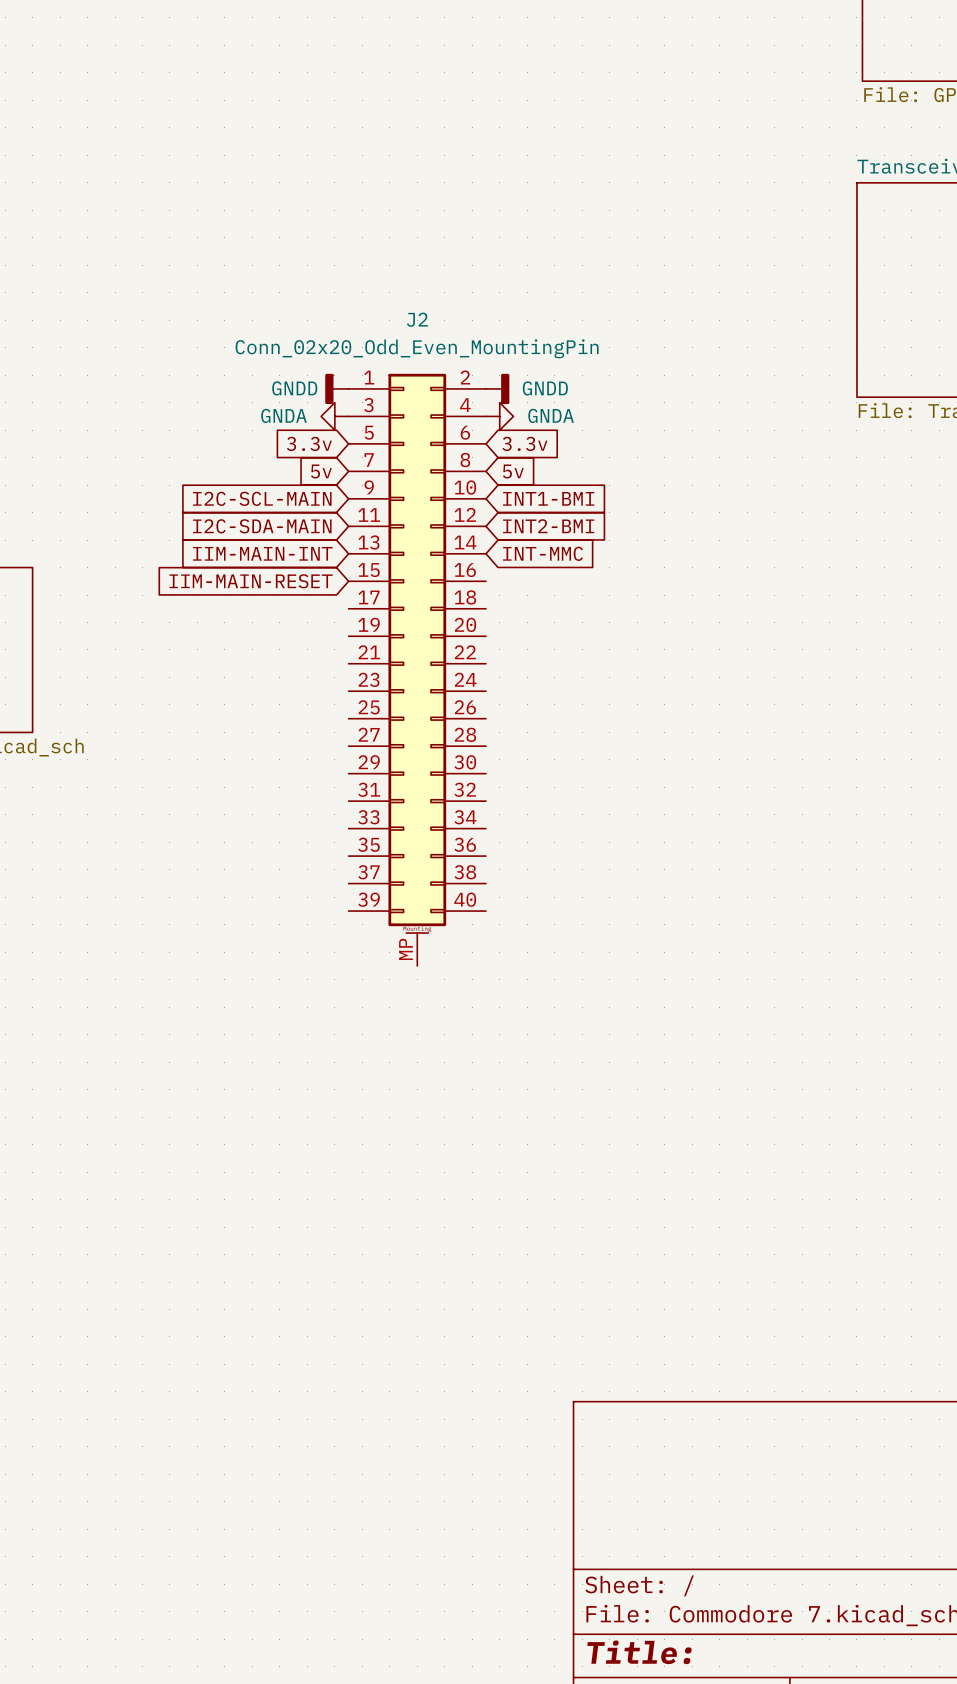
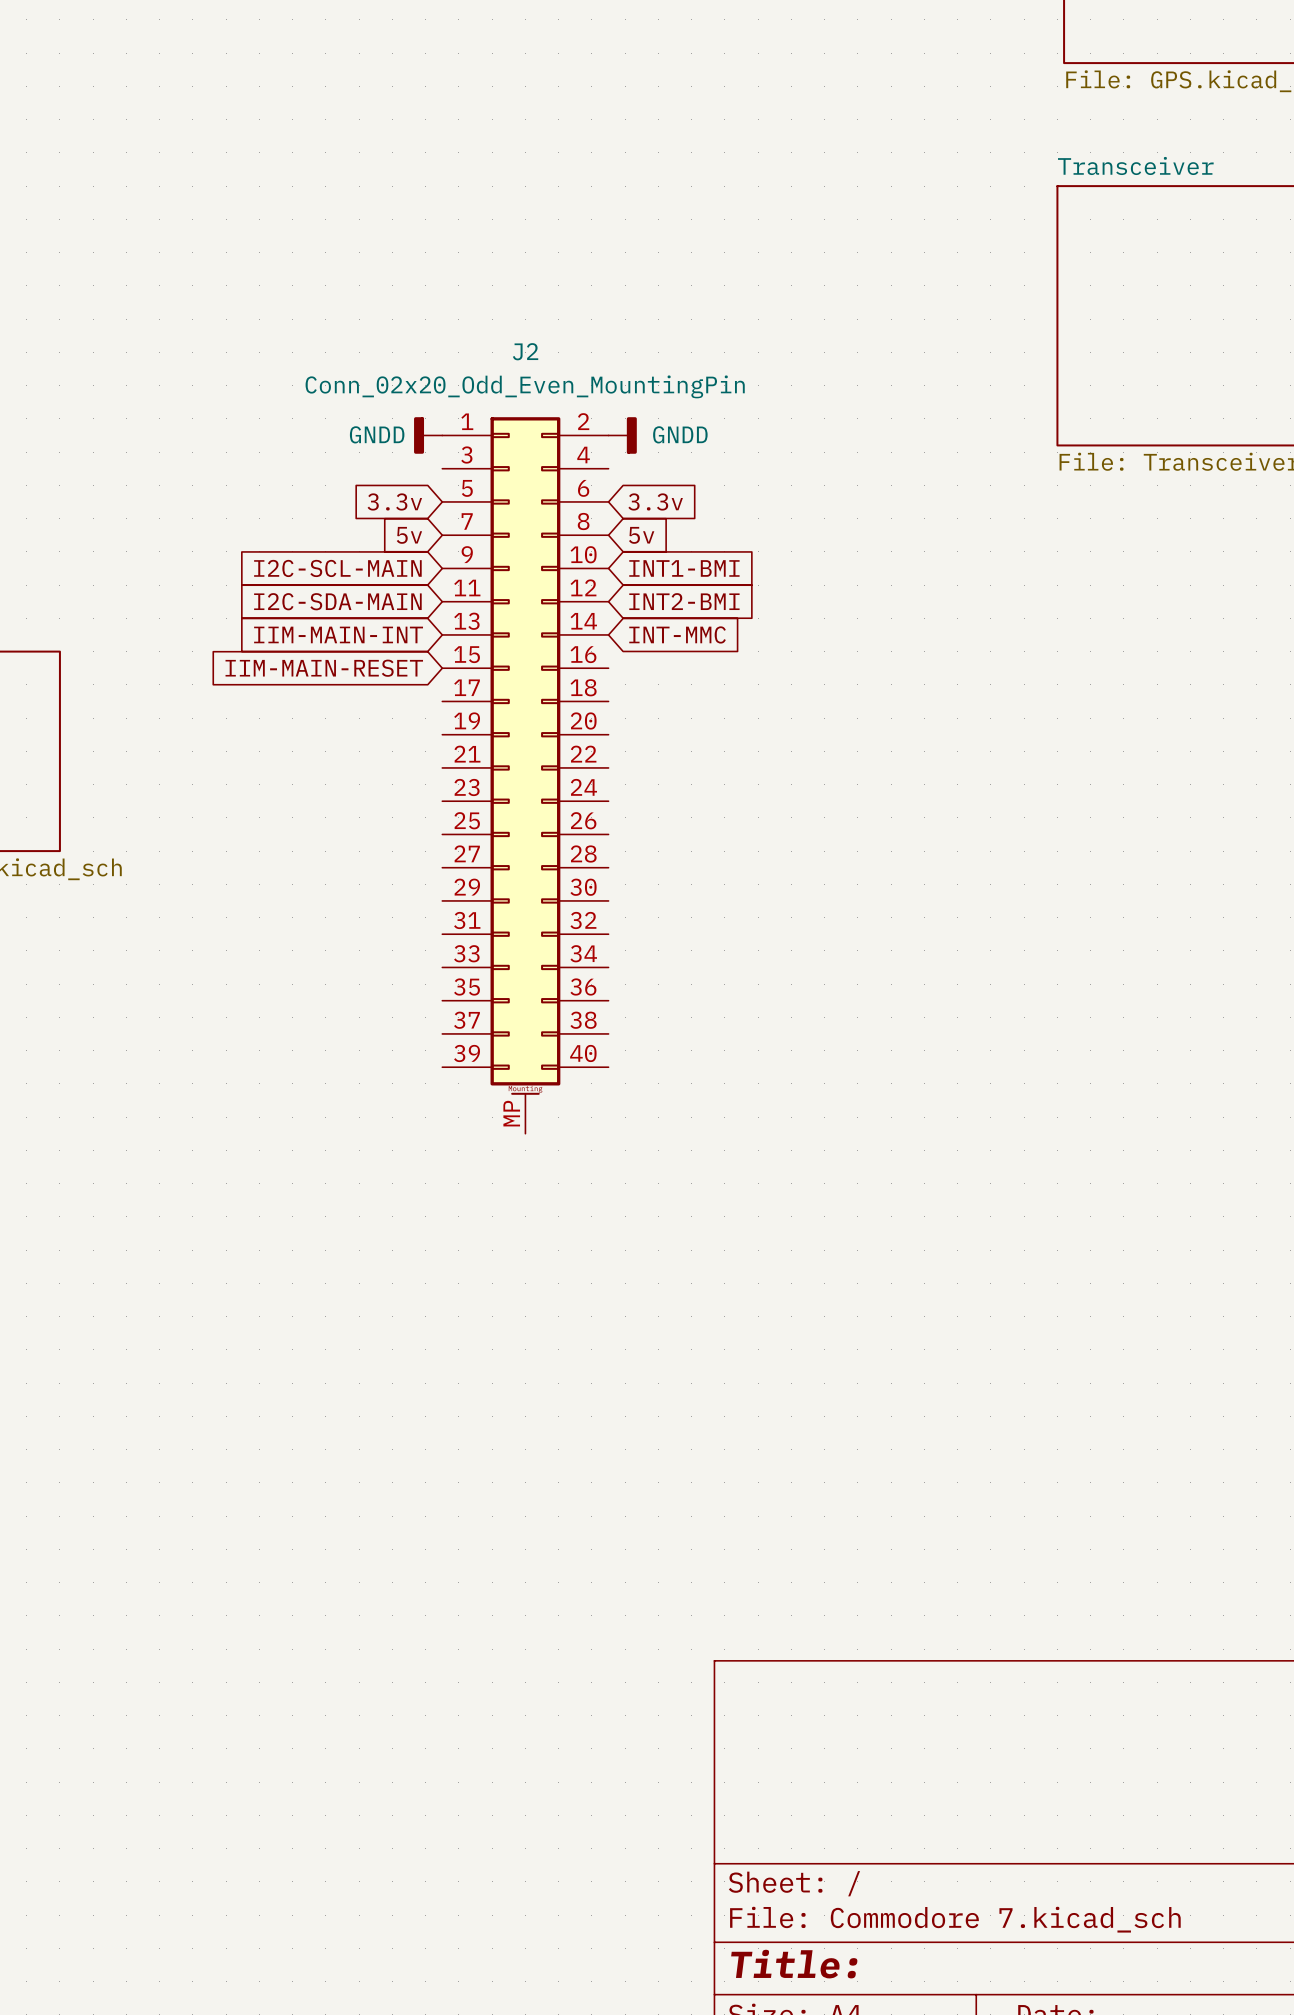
power symbol: GNDA (334, 416) -> none
power symbol: GNDA (499, 416) -> none

